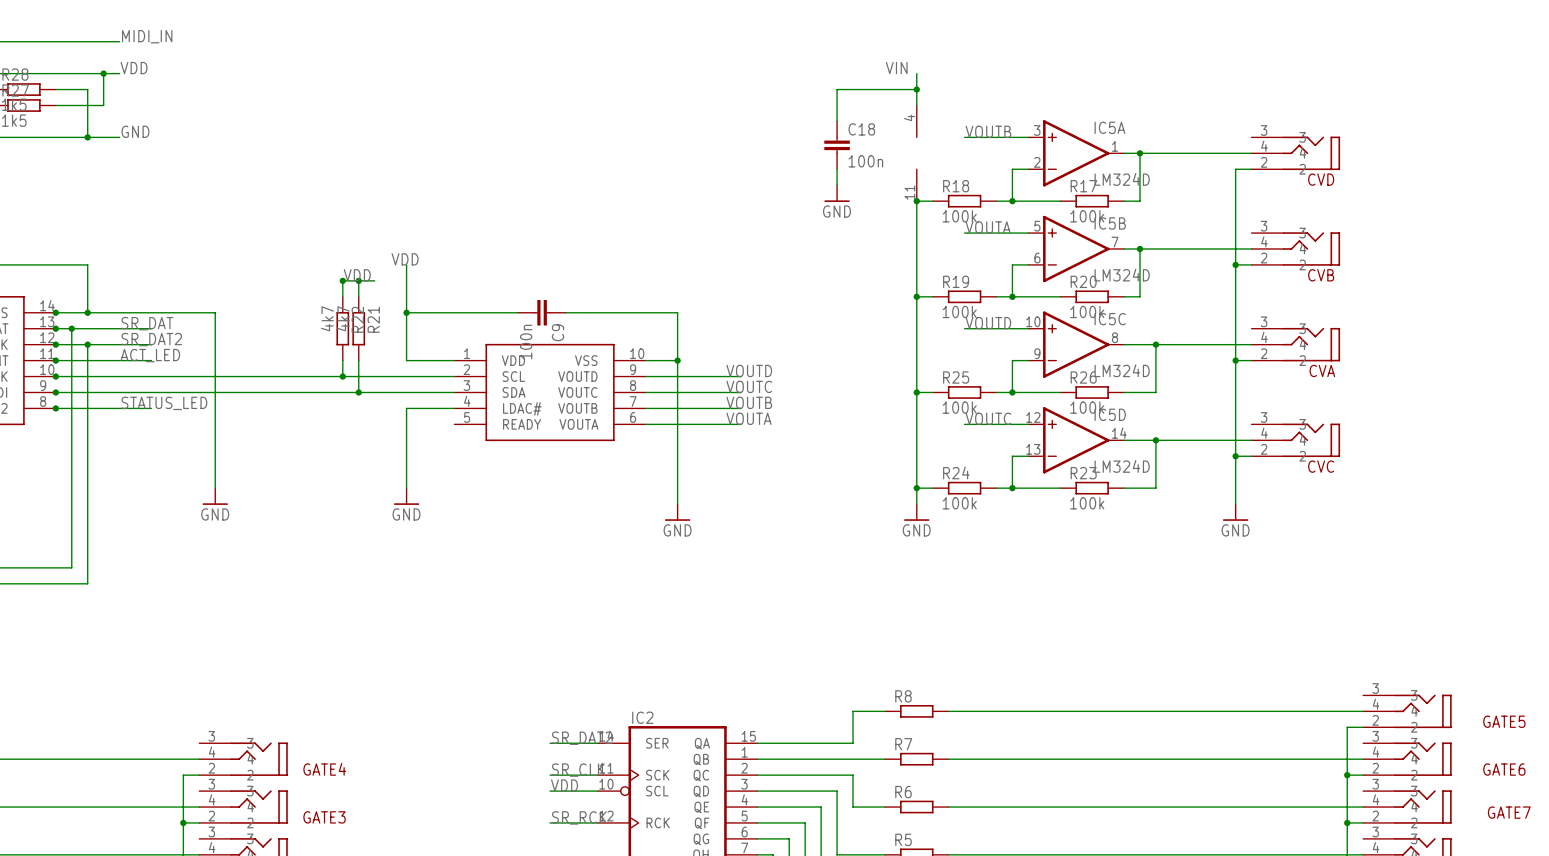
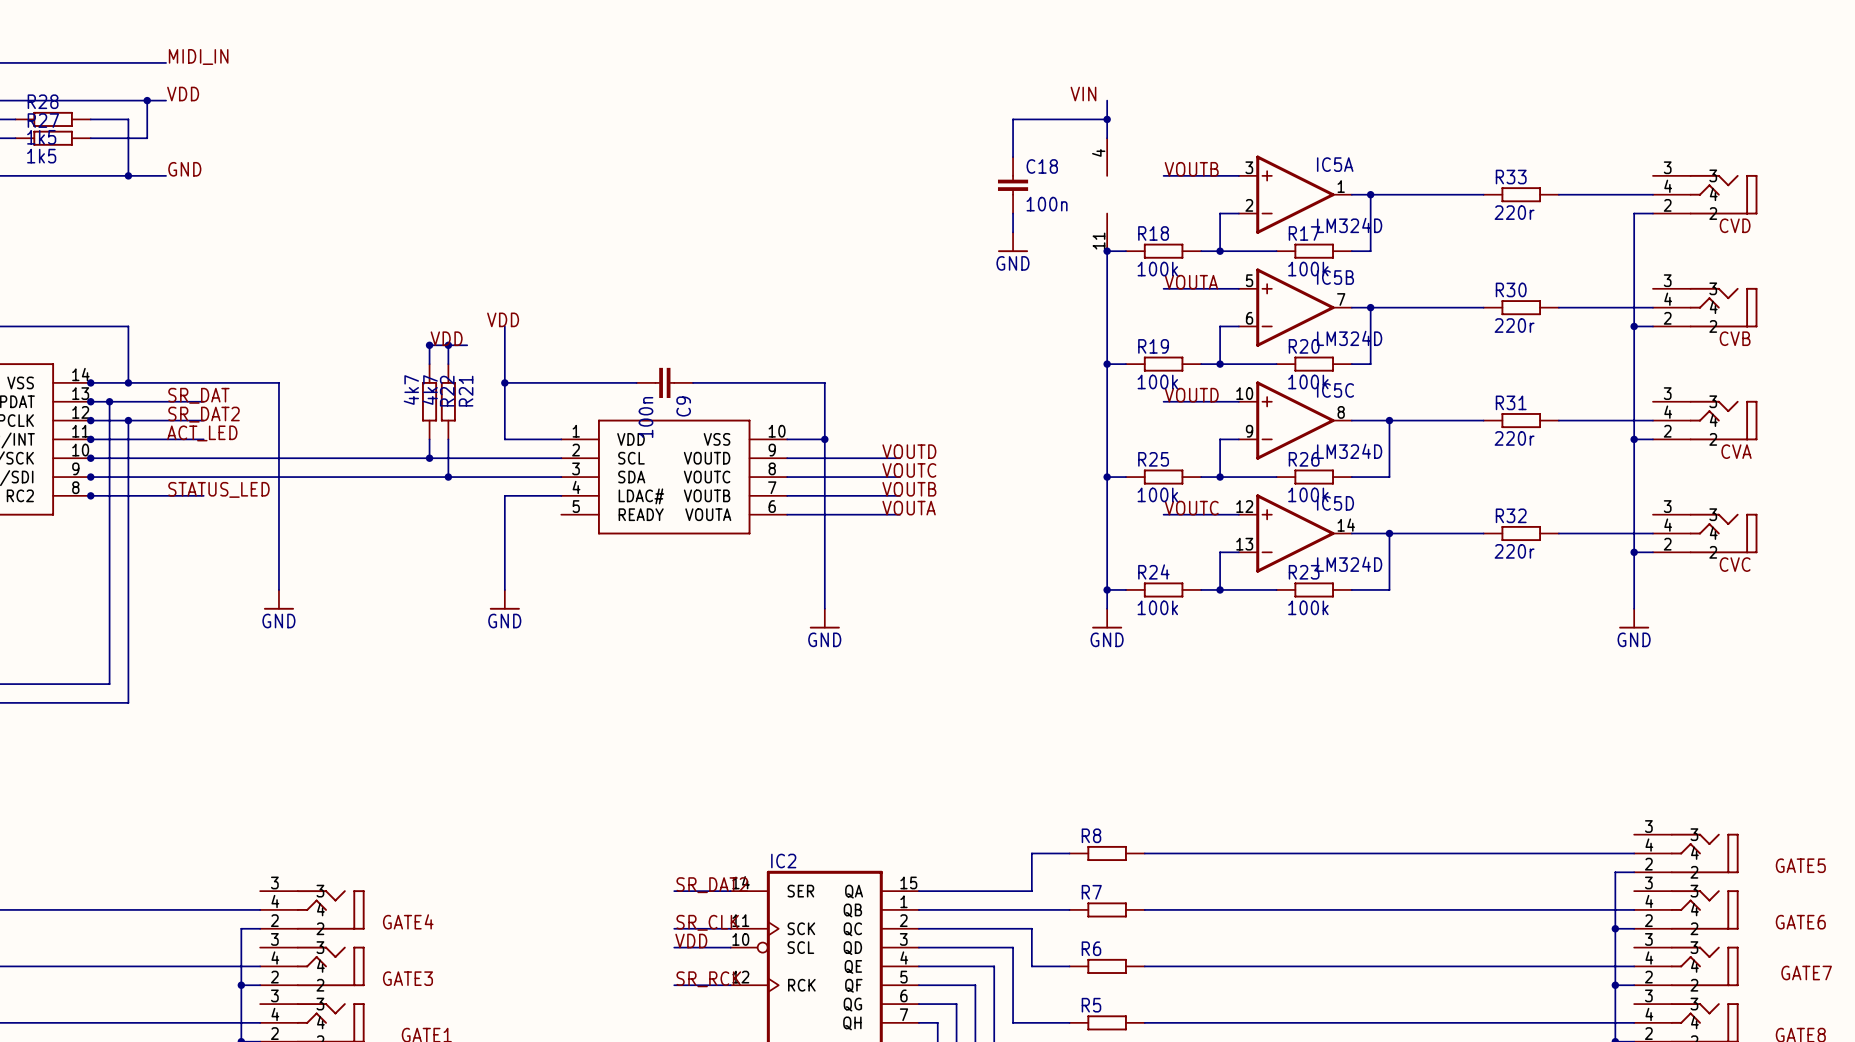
R33: none -> 220r (1521, 194)
CVD position: (1295, 153) -> (1705, 194)
wire: none -> (1558, 194) (1652, 194)
wire: (1251, 169) (1235, 169) (1235, 504) -> (1652, 213) (1634, 213) (1634, 608)
R30: none -> 220r (1521, 307)
CVB position: (1295, 248) -> (1705, 307)
wire: none -> (1558, 307) (1652, 307)
wire: (1235, 264) (1251, 264) -> (1634, 326) (1652, 326)
junction: (1235, 264) -> none
junction: none -> (1634, 326)
R31: none -> 220r (1521, 420)
CVA position: (1295, 344) -> (1705, 420)
wire: none -> (1558, 420) (1652, 420)
wire: (1235, 360) (1251, 360) -> (1634, 439) (1652, 439)
junction: (1235, 360) -> none
junction: none -> (1634, 439)
R32: none -> 220r (1521, 533)
CVC position: (1295, 440) -> (1705, 533)
wire: none -> (1558, 533) (1652, 533)
wire: (1235, 456) (1251, 456) -> (1634, 552) (1652, 552)
junction: (1235, 456) -> none
junction: none -> (1634, 552)
power symbol position: GND (1235, 512) -> GND (1634, 618)

